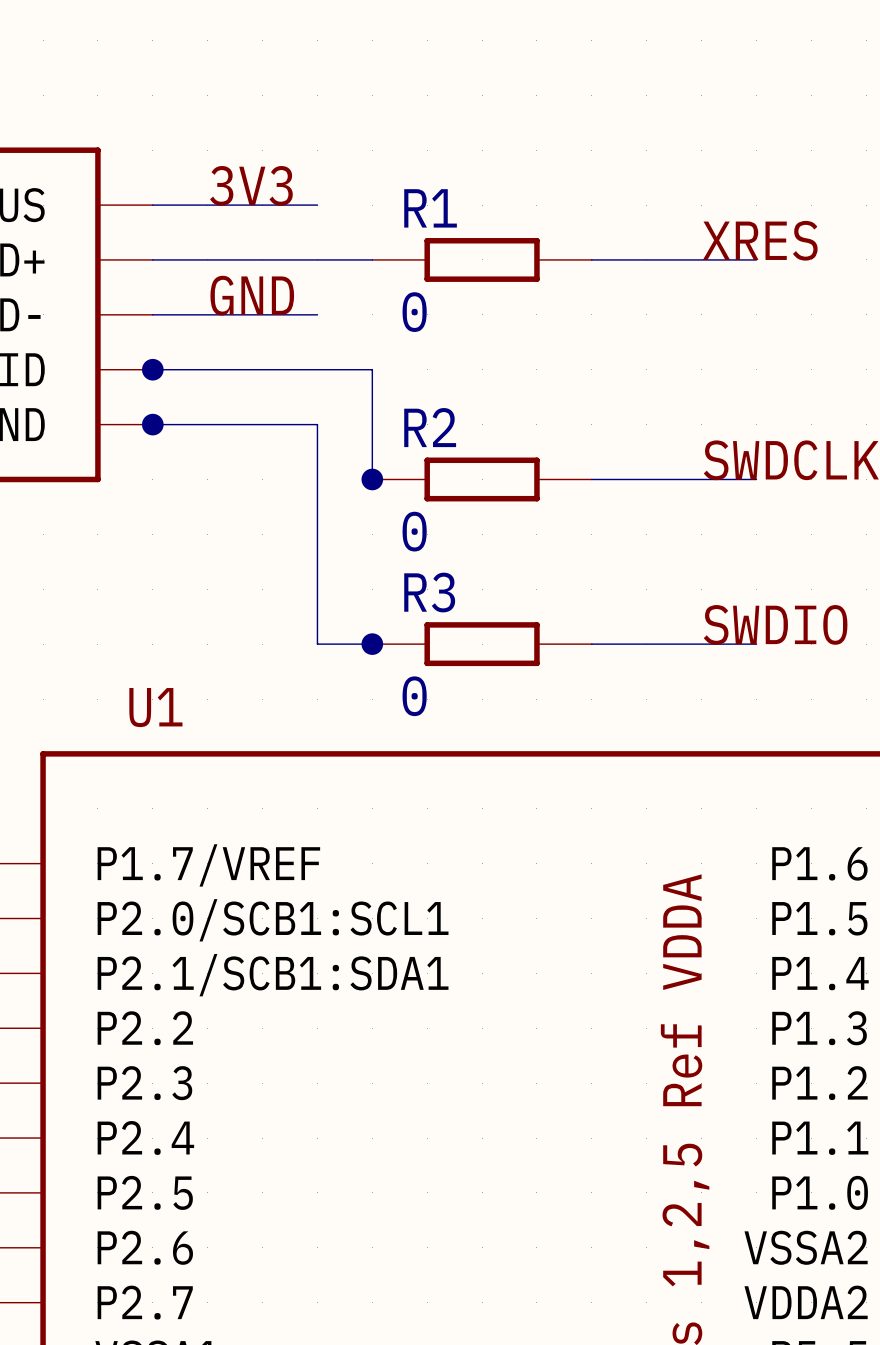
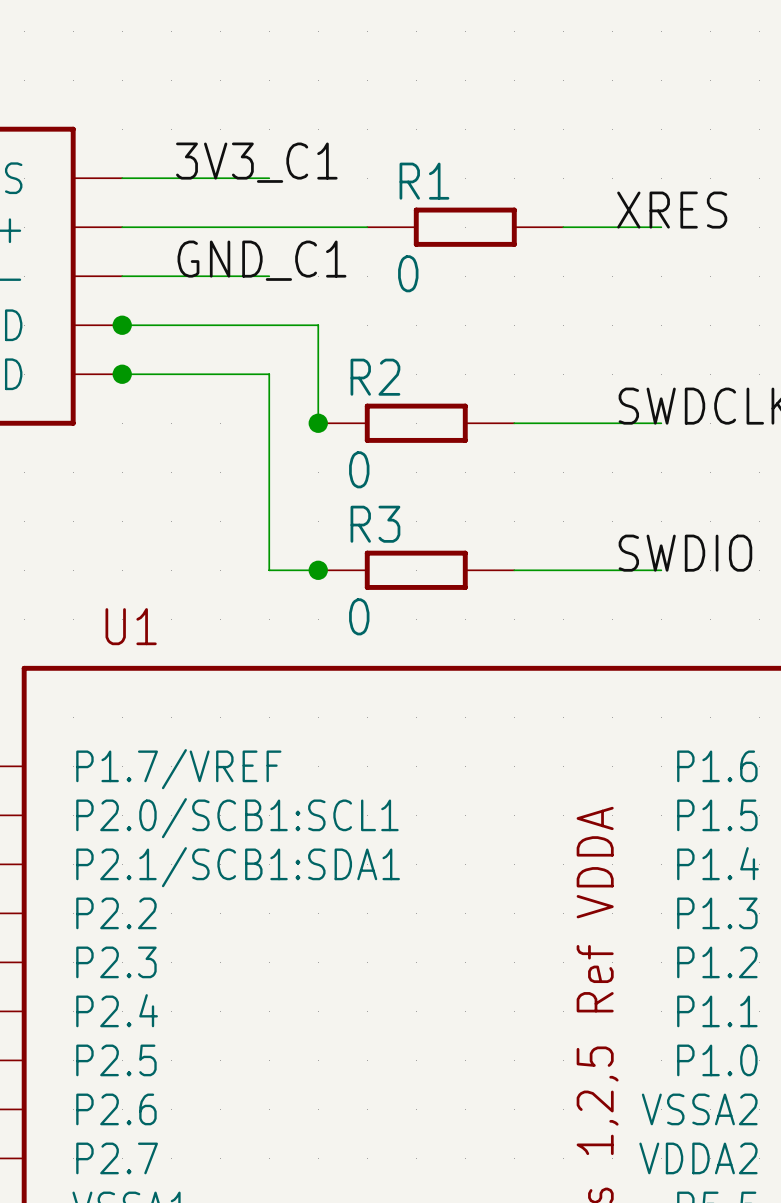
label: 3V3 (251, 185) -> 3V3_C1 (256, 162)
R1 position: (482, 259) -> (465, 227)
label: GND (252, 295) -> GND_C1 (261, 260)

